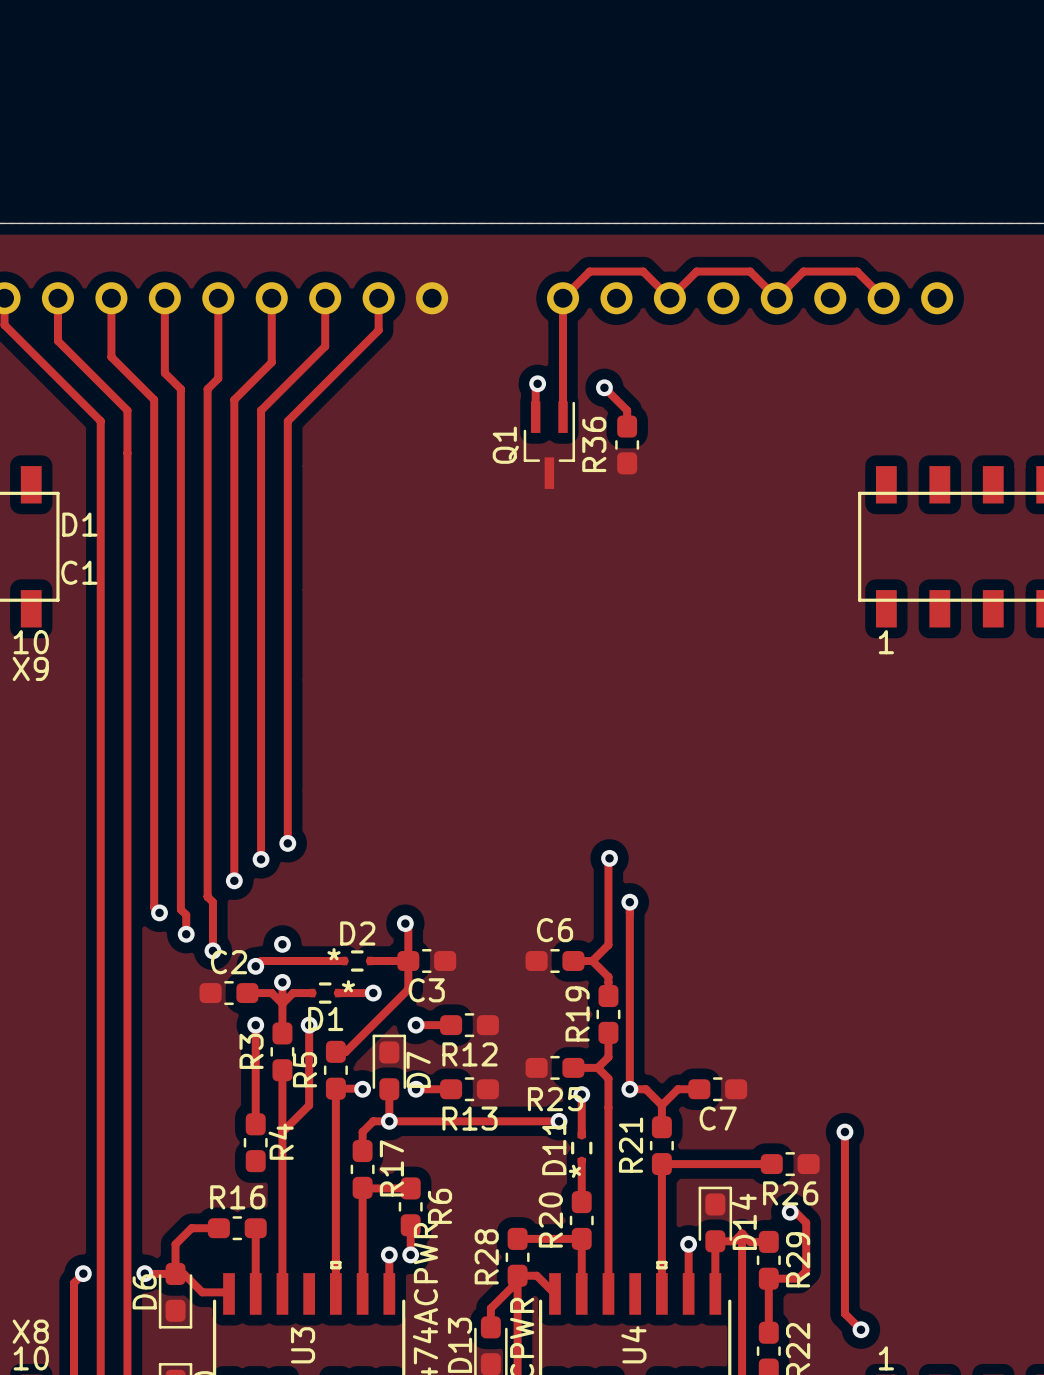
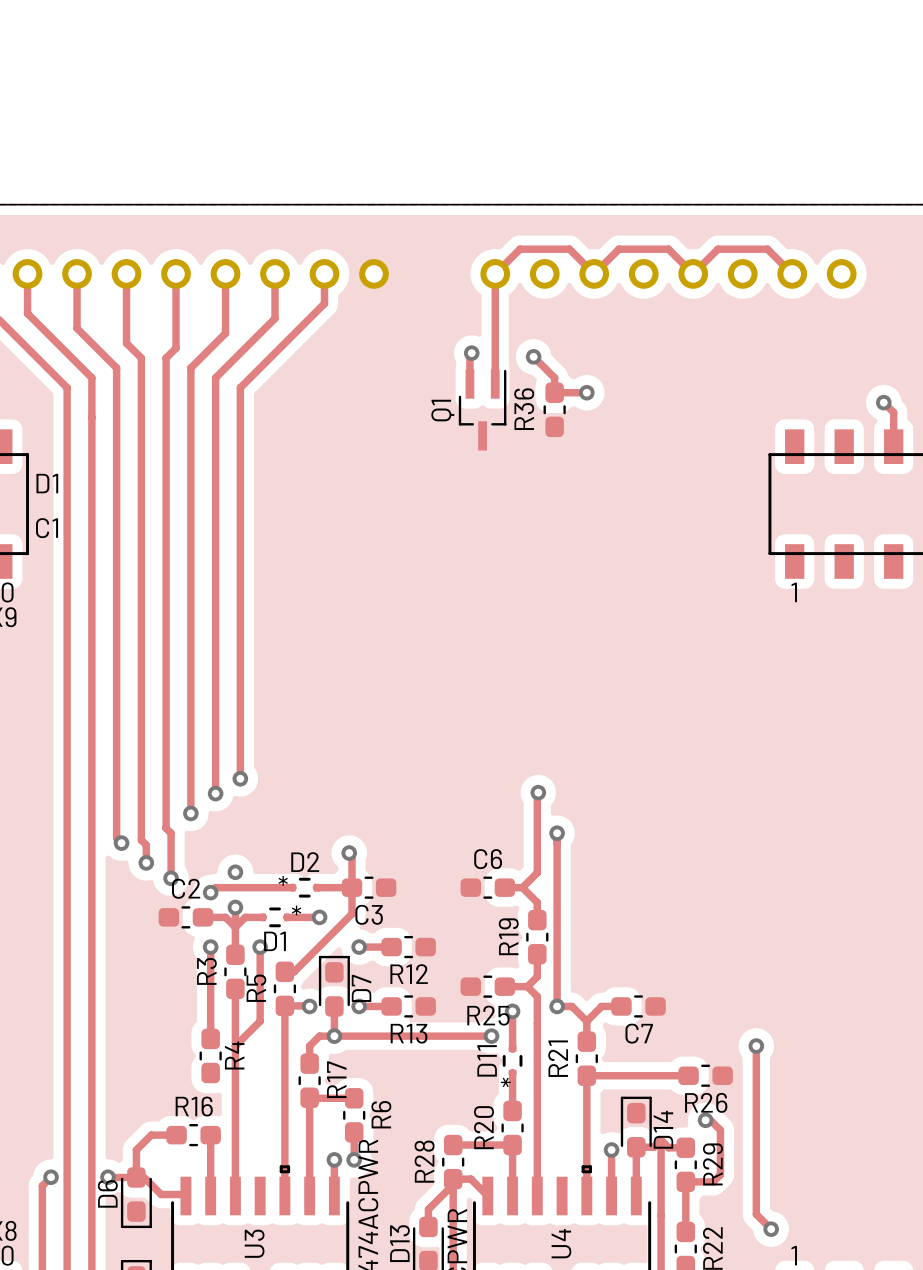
track: none -> (554, 392) (586, 392)
via: none -> (586, 392)
track: none -> (883, 402) (893, 412) (893, 446)
via: none -> (883, 402)

